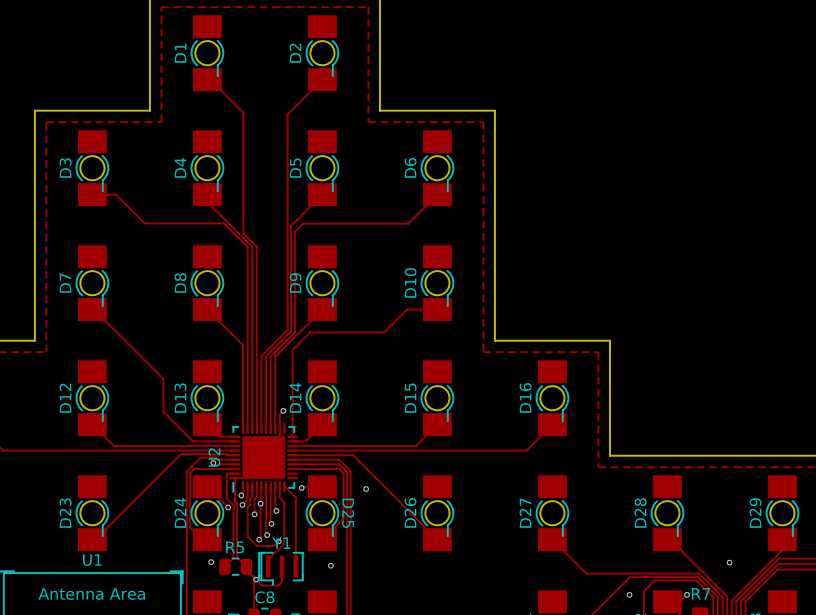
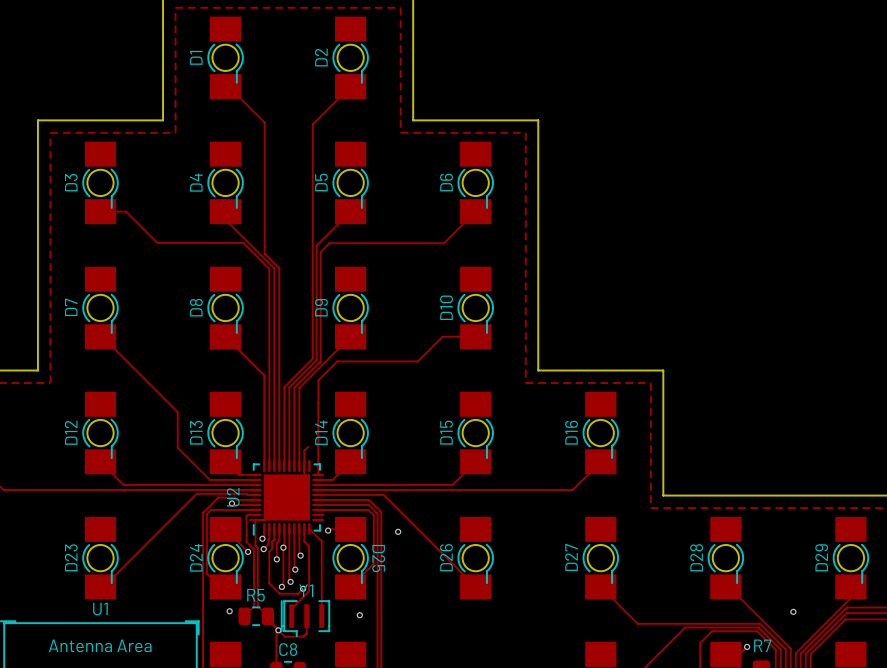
via: (283, 410) -> none
via: (629, 594) -> none

